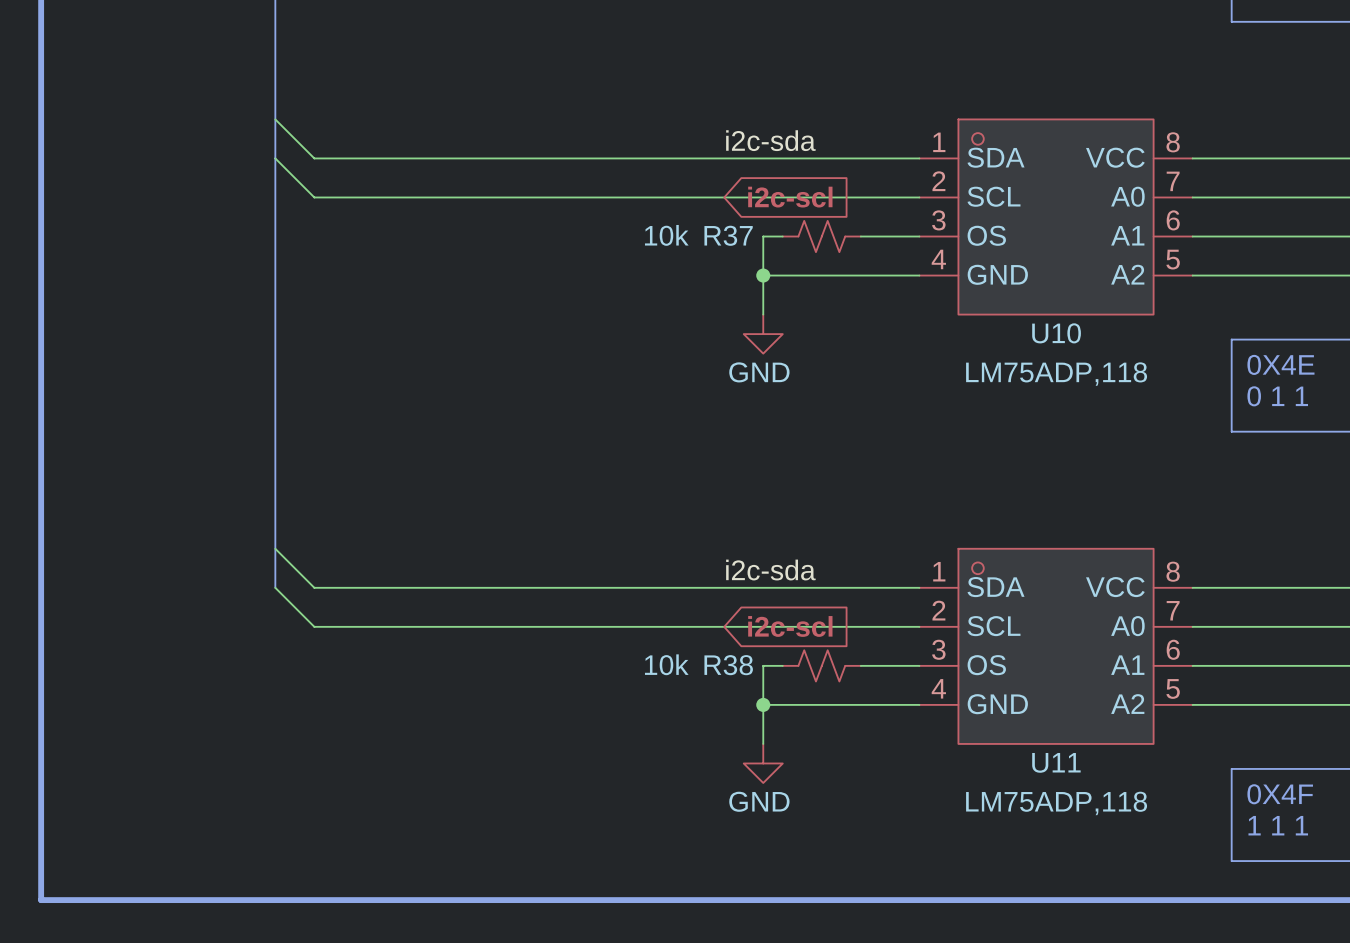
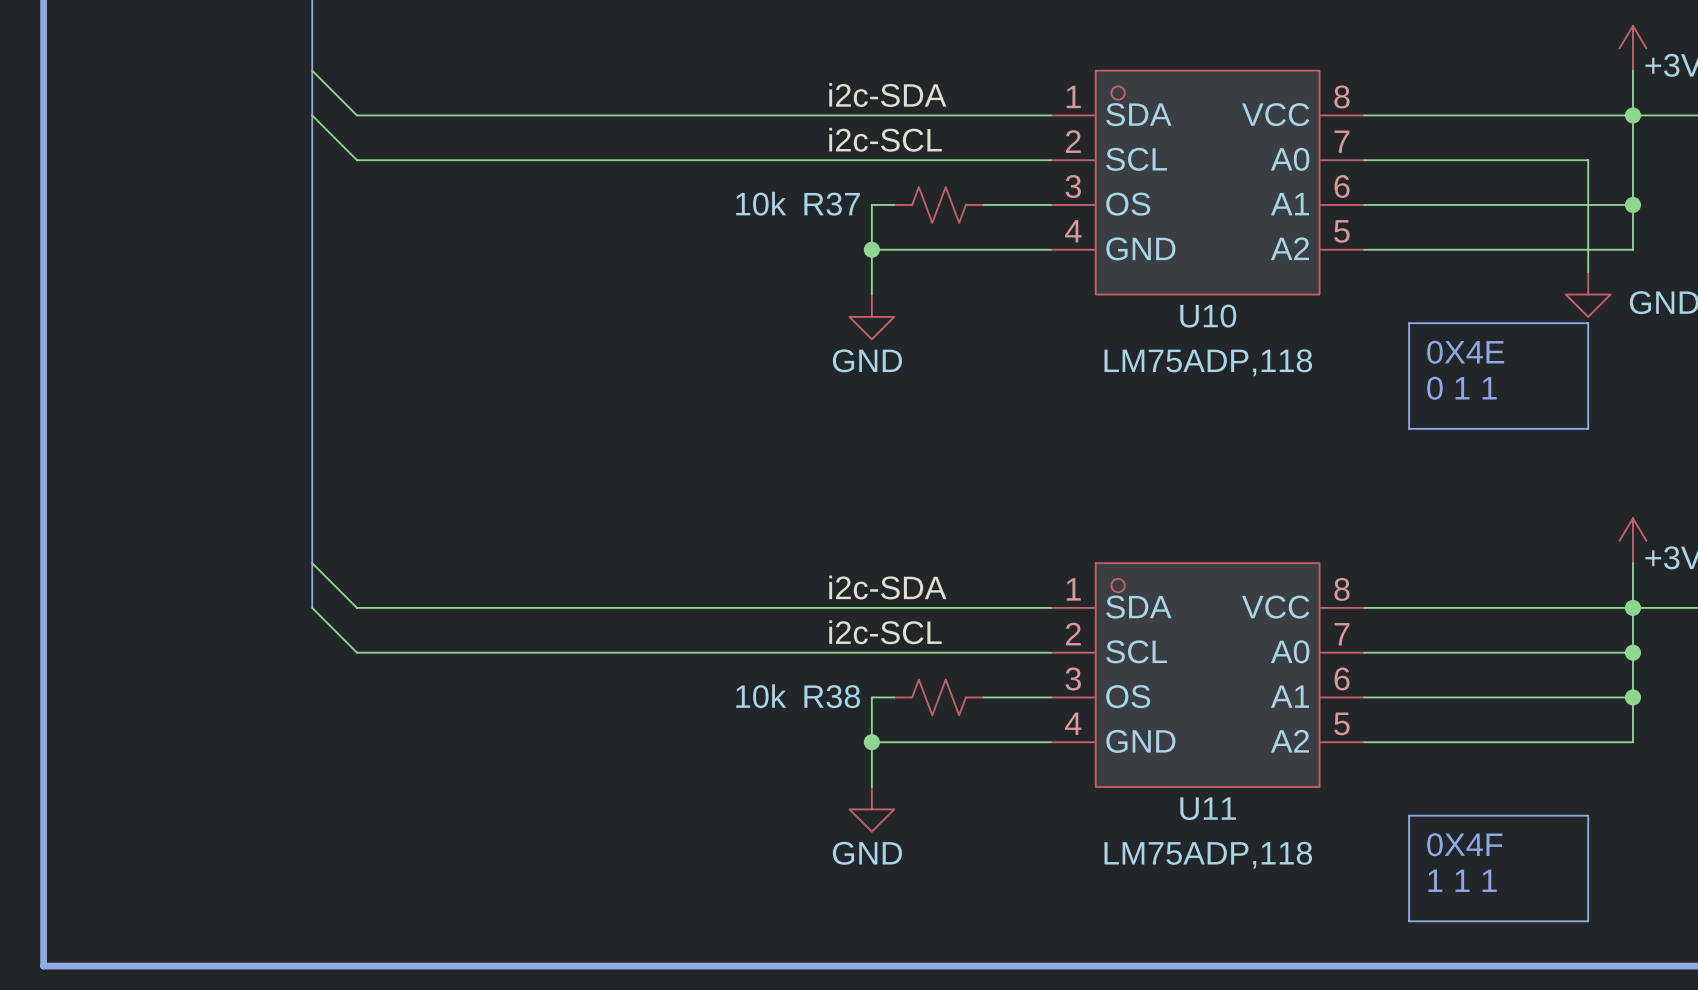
label: i2c-sda (770, 140) -> i2c-SDA (887, 95)
label: none -> i2c-SCL (885, 139)
global label: i2c-scl (790, 197) -> none
label: i2c-sda (770, 570) -> i2c-SDA (887, 587)
label: none -> i2c-SCL (885, 632)
global label: i2c-scl (790, 626) -> none

